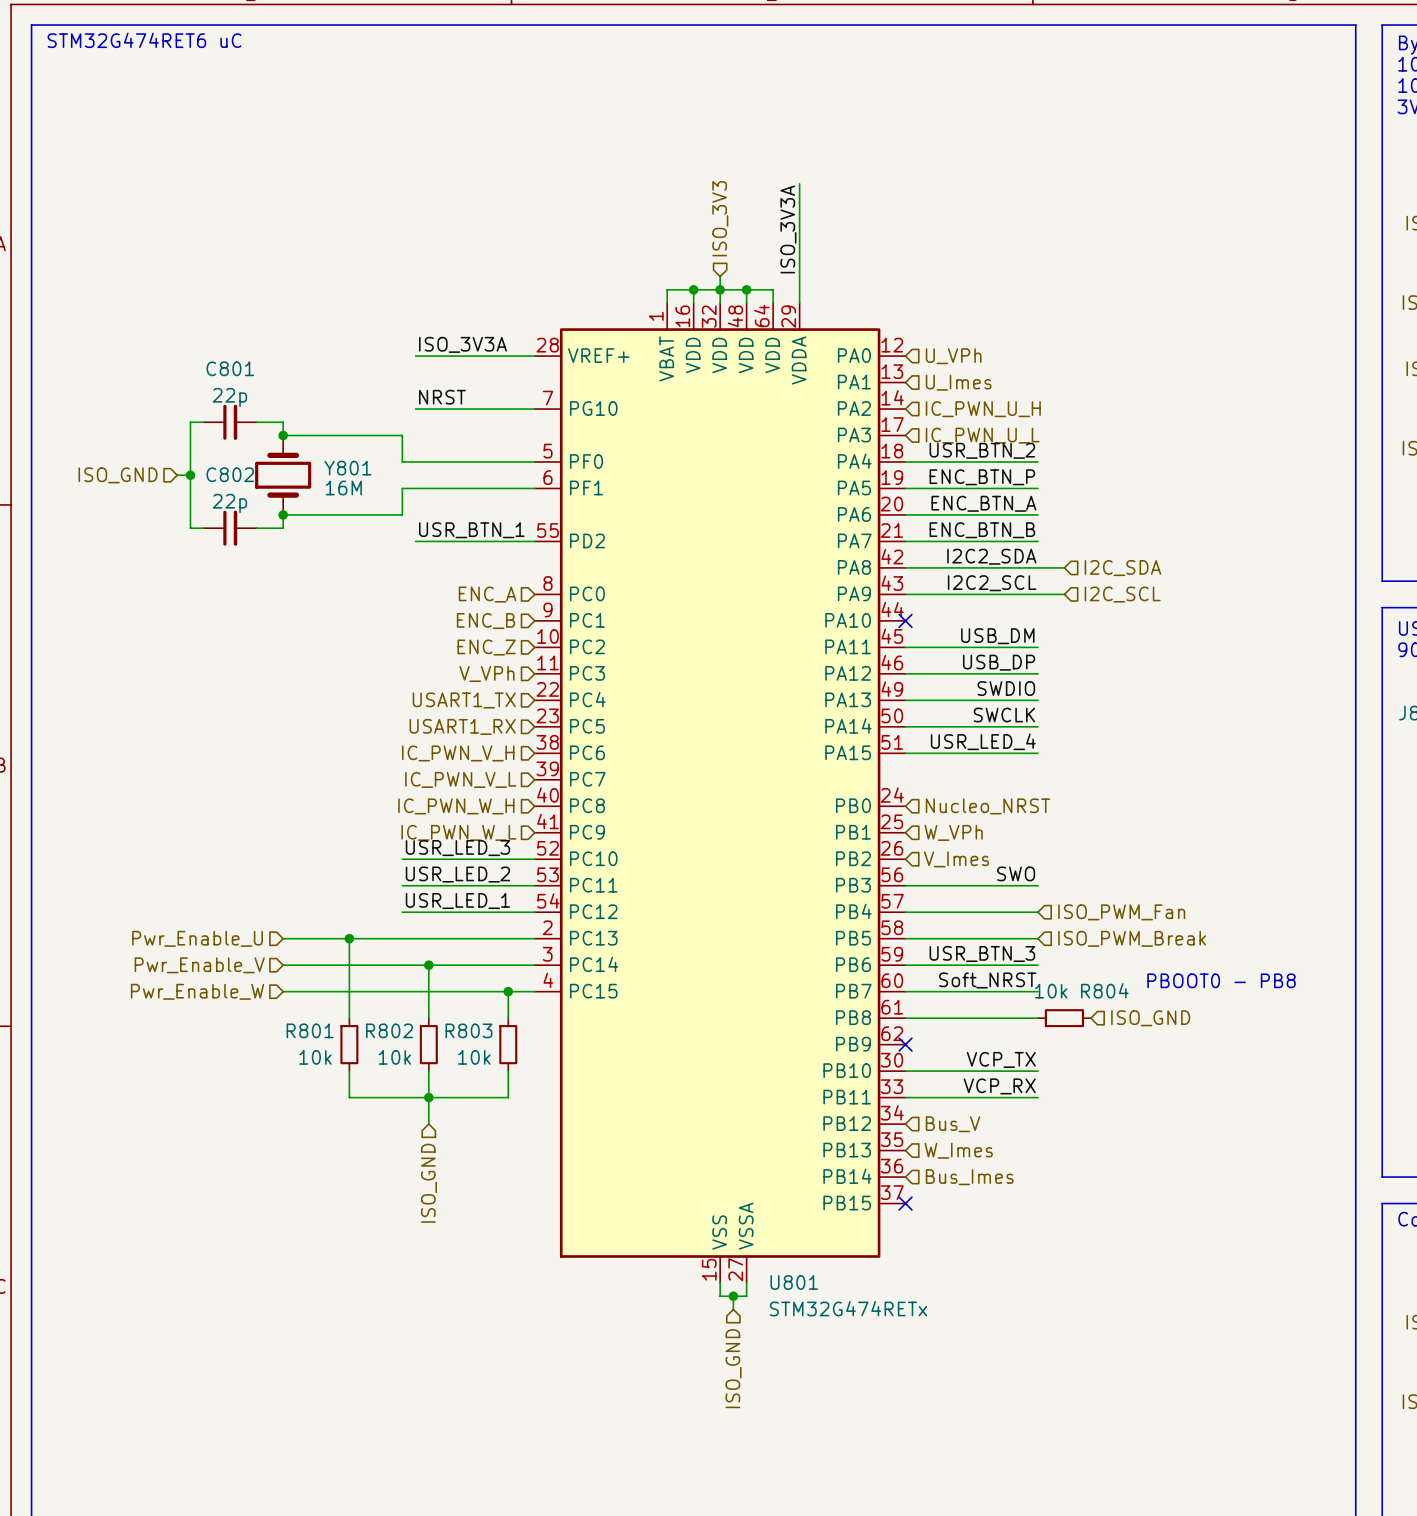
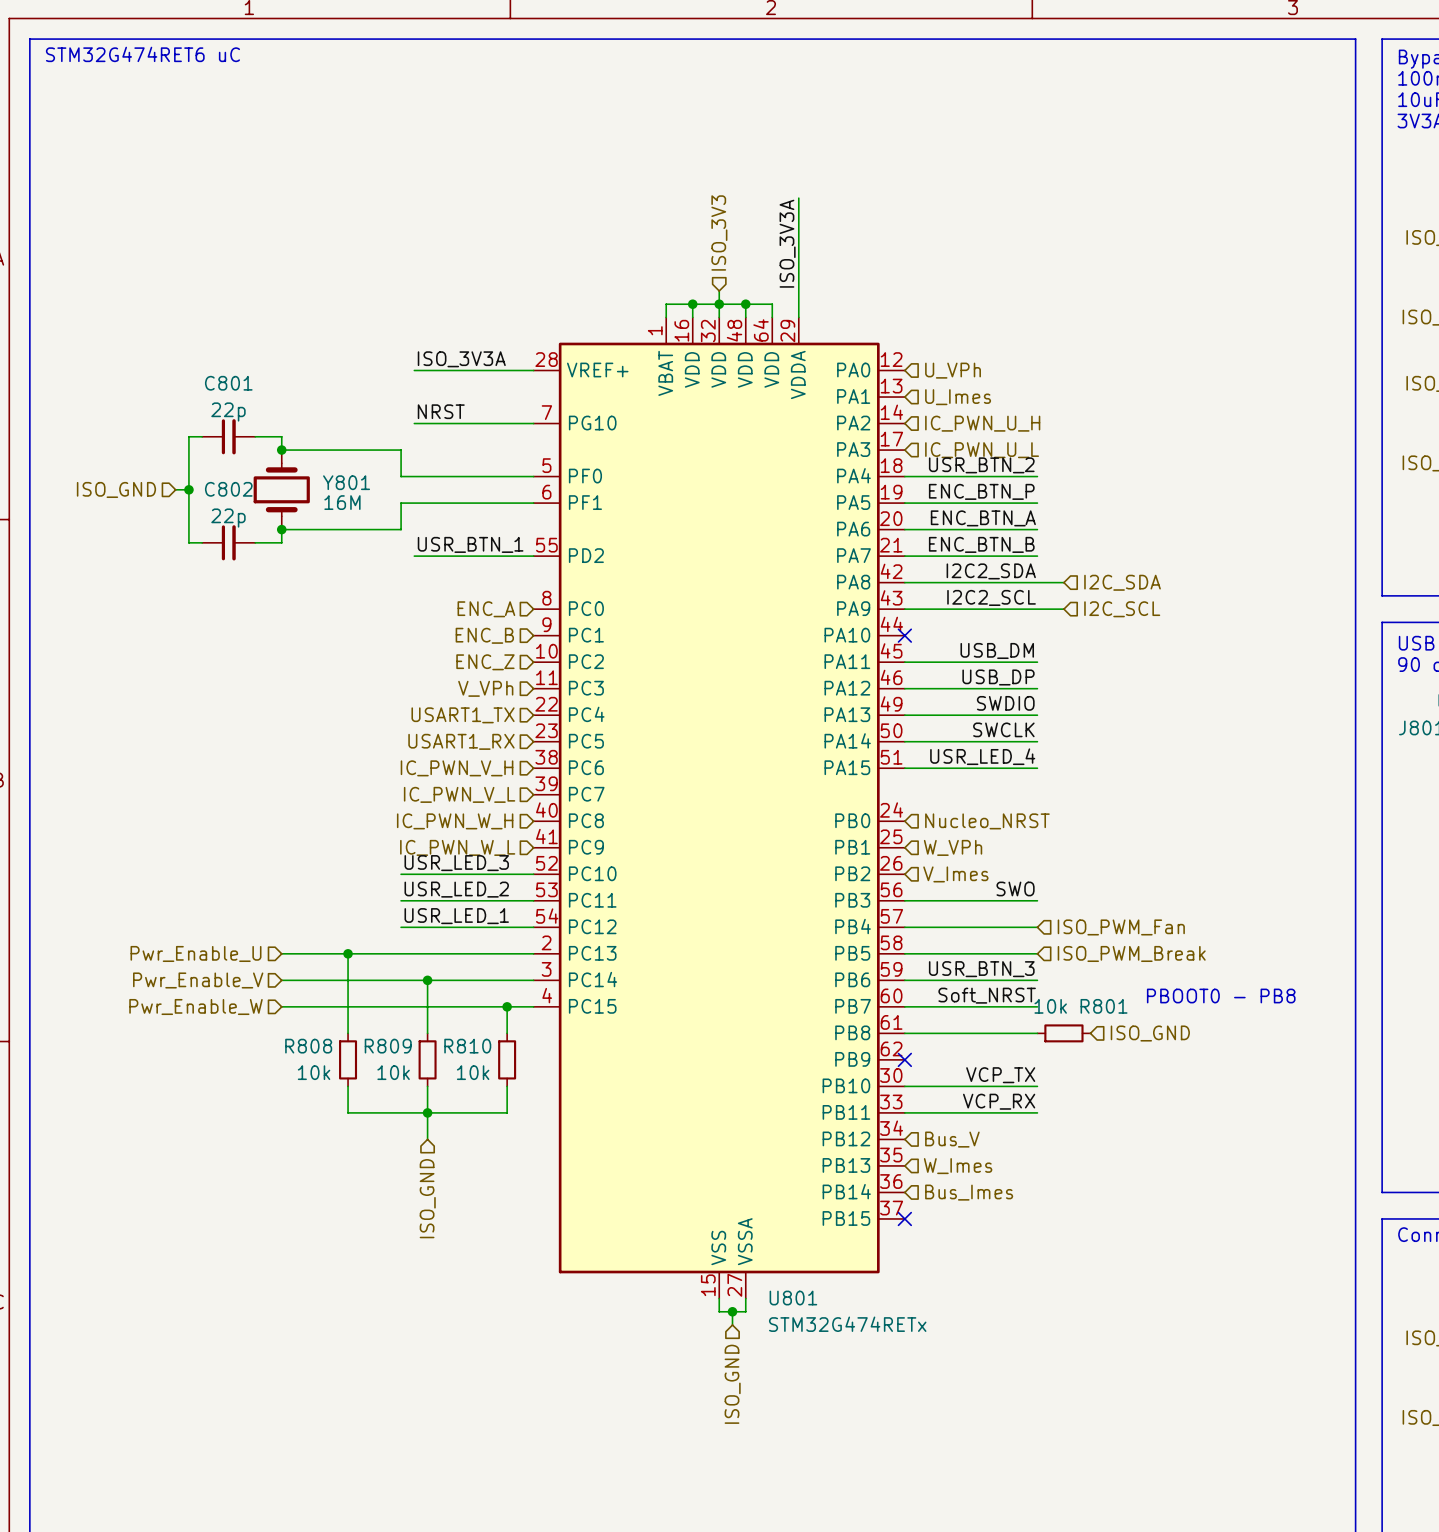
R804 name: R804 (1104, 990) -> R801 (1104, 1006)
R801 name: R801 (310, 1030) -> R808 (308, 1046)
R802 name: R802 (389, 1030) -> R809 (388, 1046)
R803 name: R803 (468, 1030) -> R810 (467, 1046)

